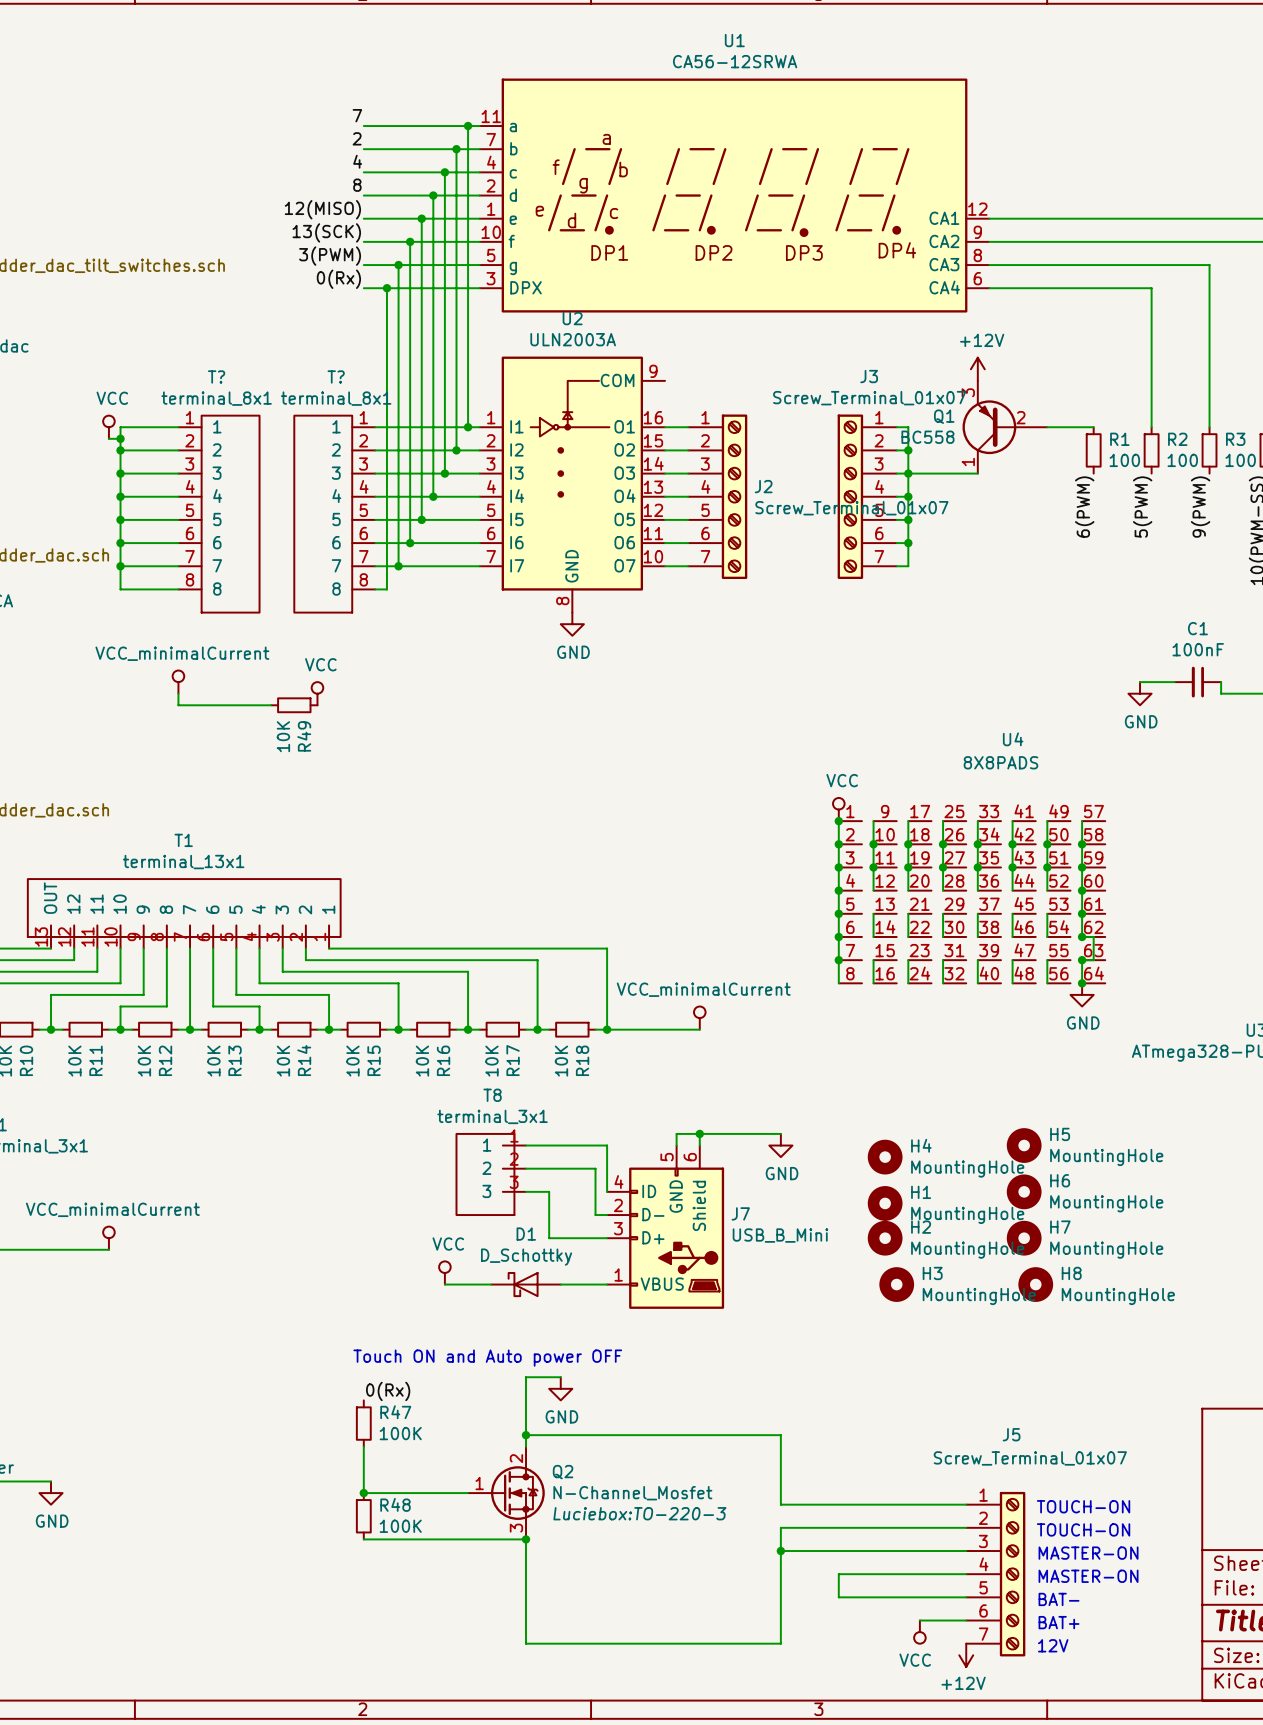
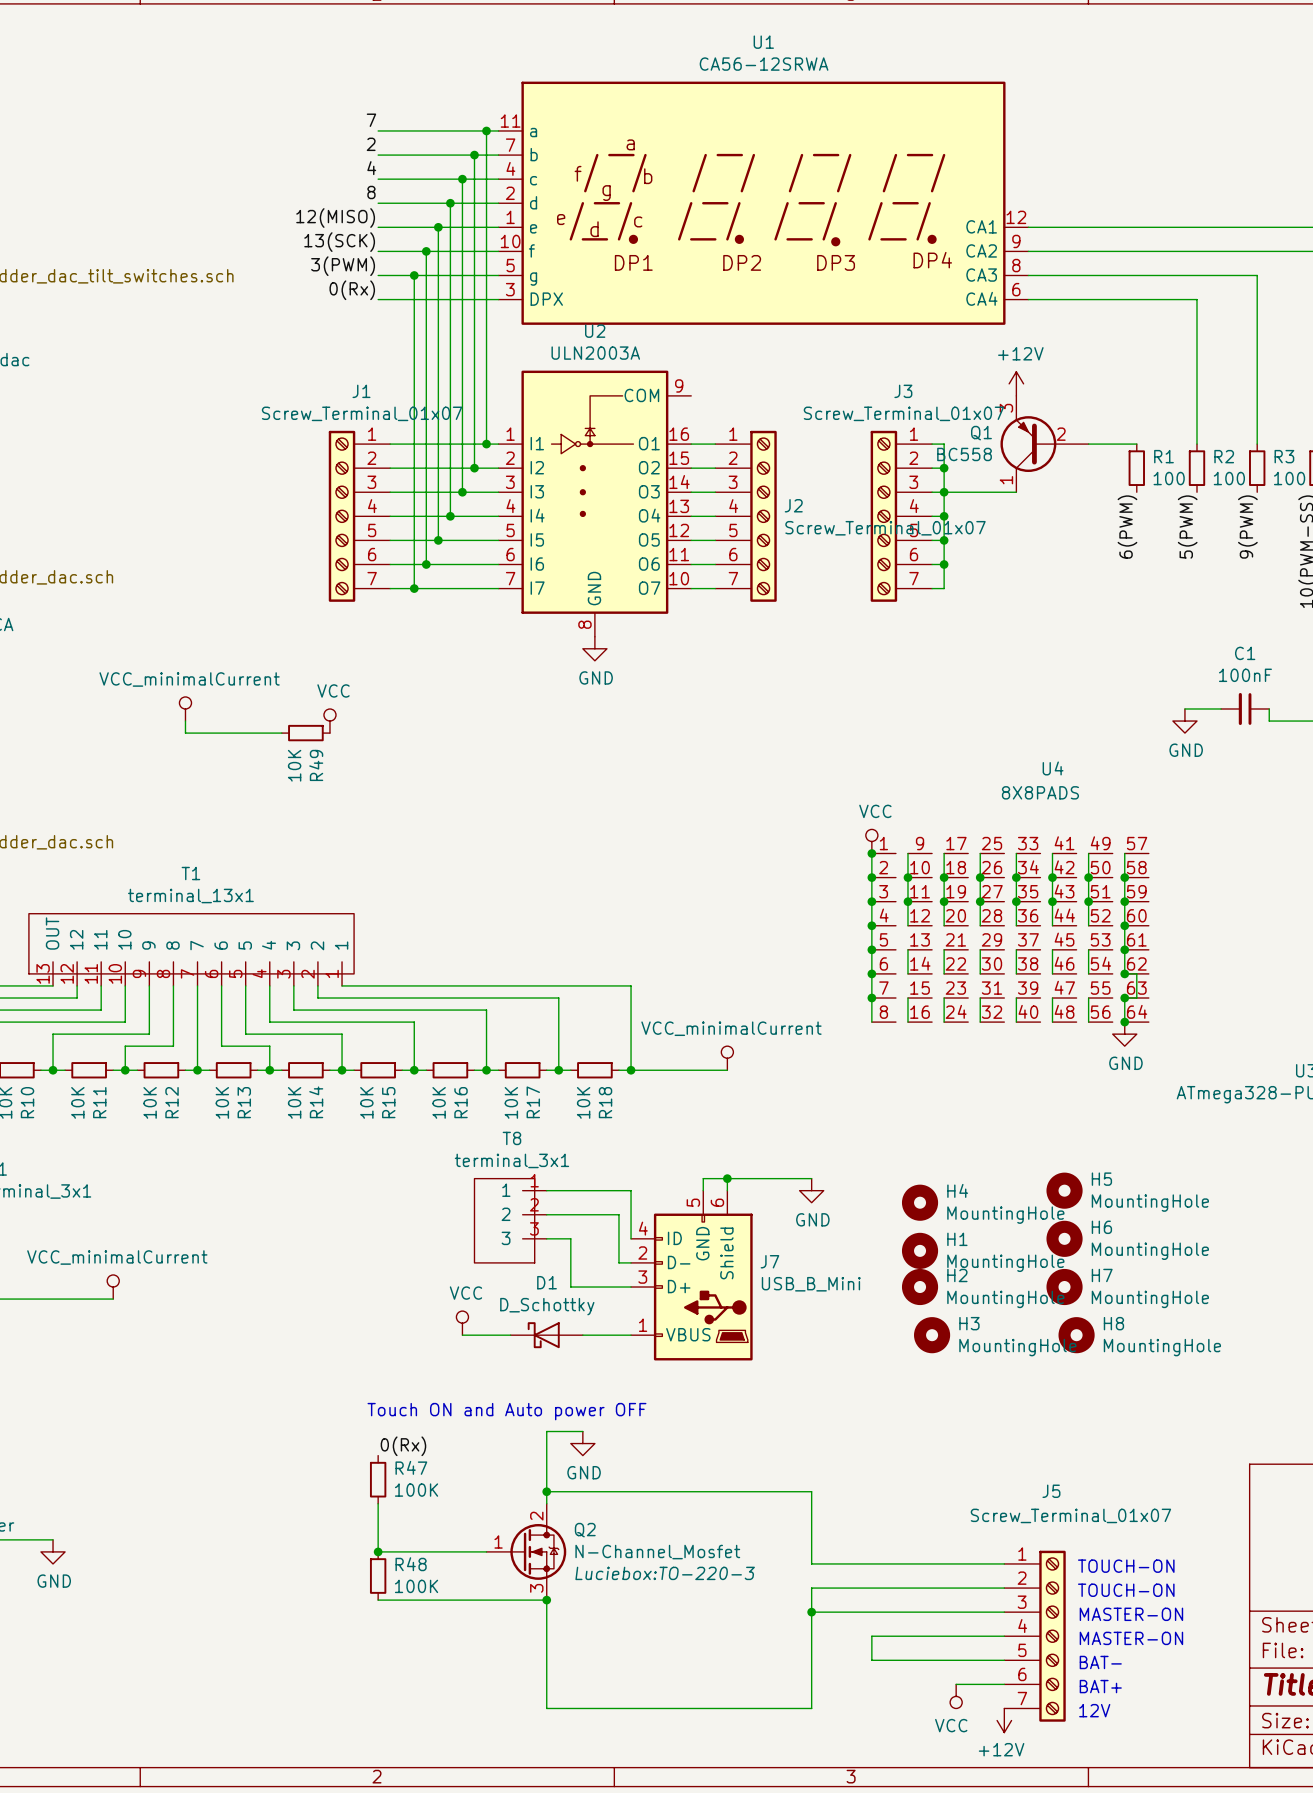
wire: (386, 288) (386, 589) (375, 589) -> none
junction: (386, 288) -> none
power symbol: VCC (108, 427) -> none
wire: (178, 427) (120, 427) (120, 589) (178, 589) -> none
wire: (108, 438) (120, 438) -> none
junction: (120, 438) -> none
wire: (120, 450) (178, 450) -> none
junction: (120, 450) -> none
wire: (120, 473) (178, 473) -> none
junction: (120, 473) -> none
wire: (120, 496) (178, 496) -> none
junction: (120, 496) -> none
J1: none -> Screw_Terminal_01x07 (359, 516)
T?: terminal_8x1 (218, 514) -> none
T?: terminal_8x1 (334, 514) -> none
wire: (120, 519) (178, 519) -> none
junction: (120, 519) -> none
wire: (120, 543) (178, 543) -> none
junction: (120, 543) -> none
wire: (120, 566) (178, 566) -> none
junction: (120, 566) -> none

